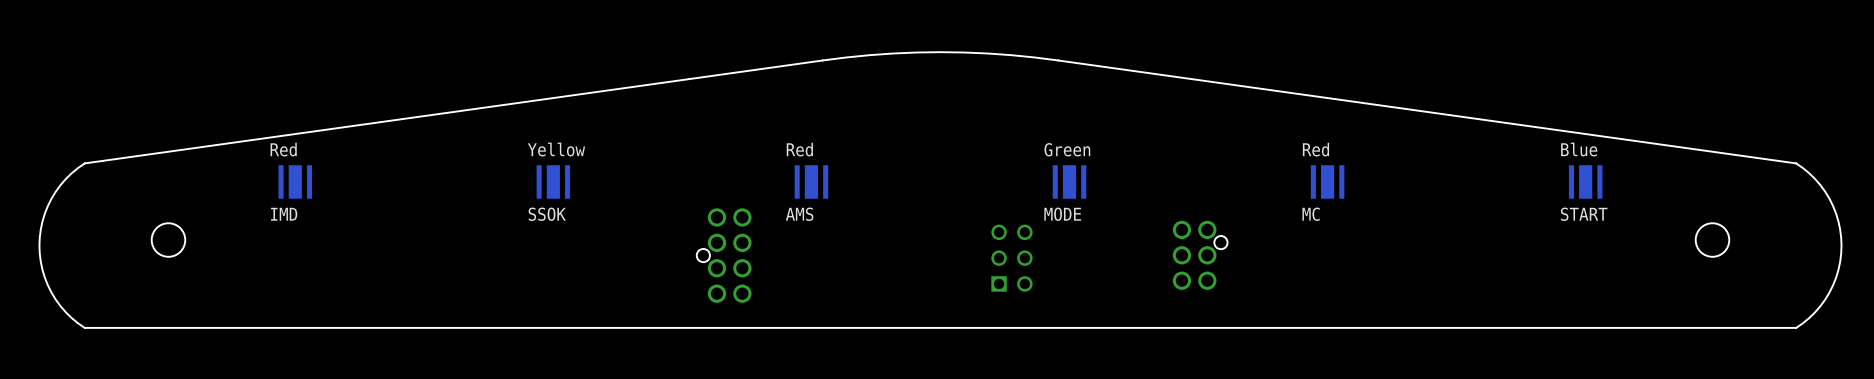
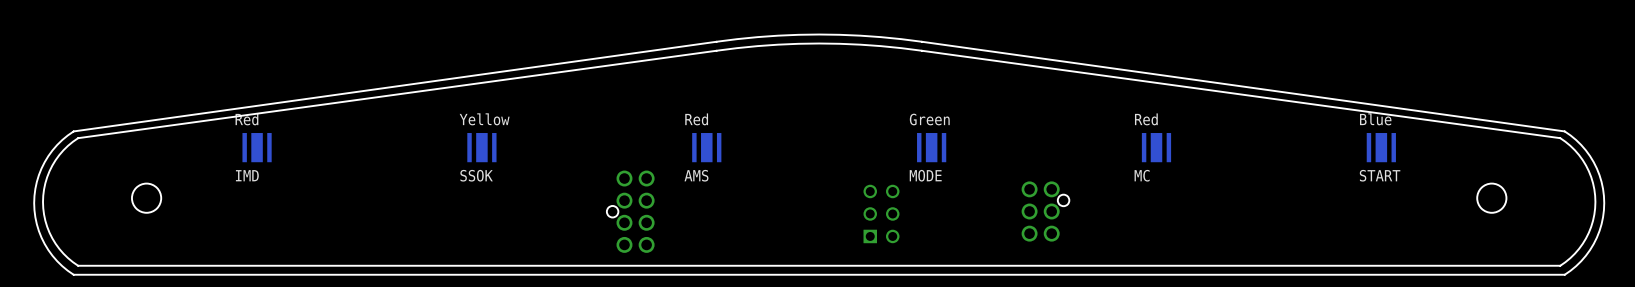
board edge: none -> (921, 50) (1560, 138) (1579, 155) (1588, 171) (1595, 195) (1593, 220) (1588, 232) (1579, 248) (1560, 265) (78, 265) (68, 258) (55, 243) (49, 232) (44, 214) (43, 195) (49, 171) (59, 155) (78, 138) (737, 48) (798, 43) (839, 43) (921, 50)

